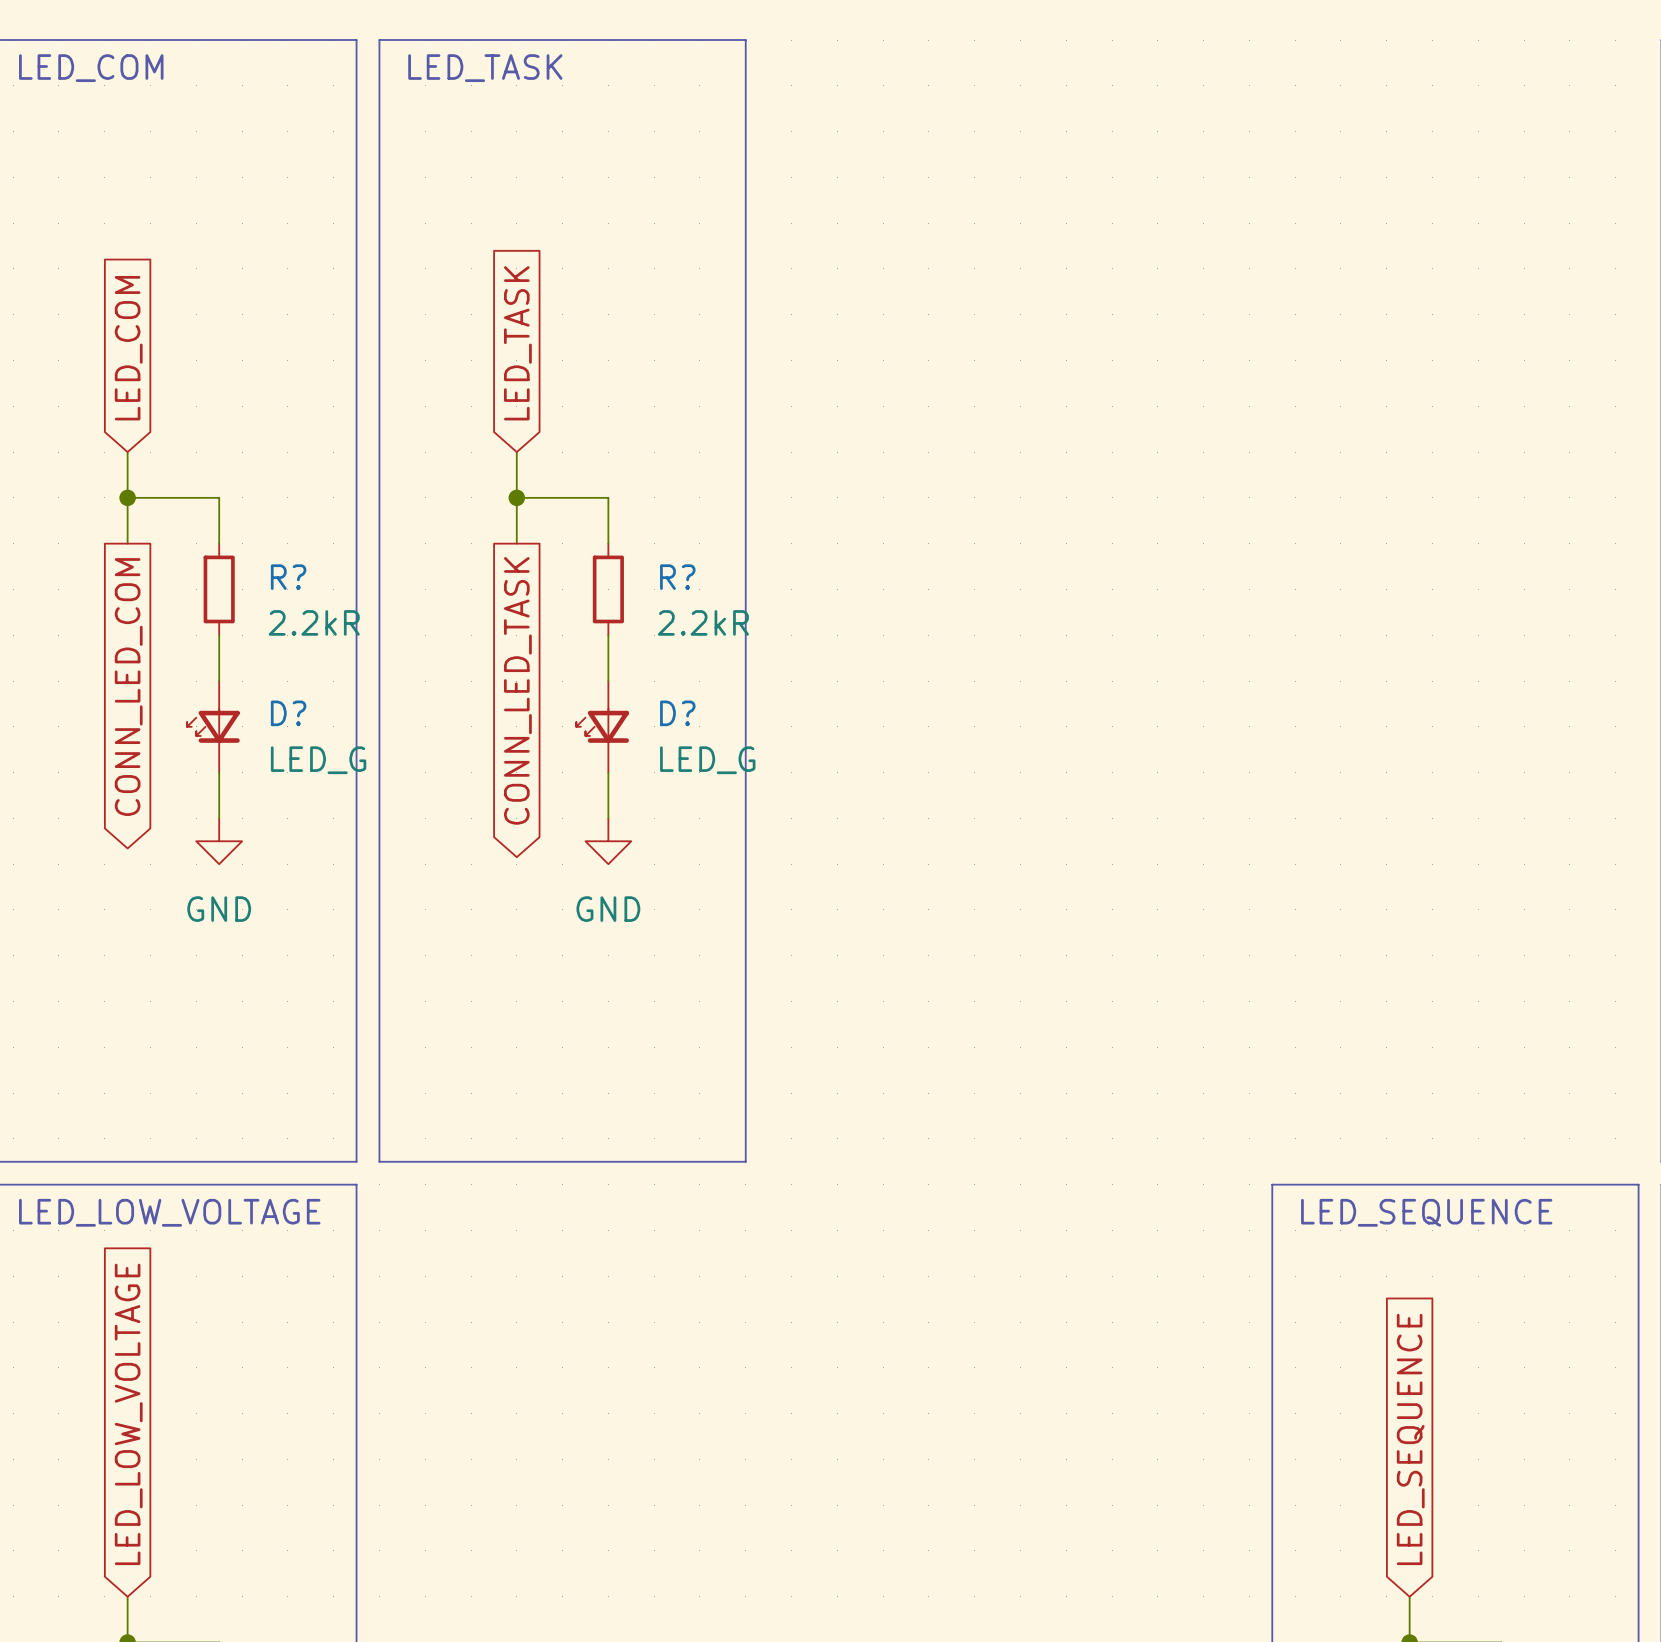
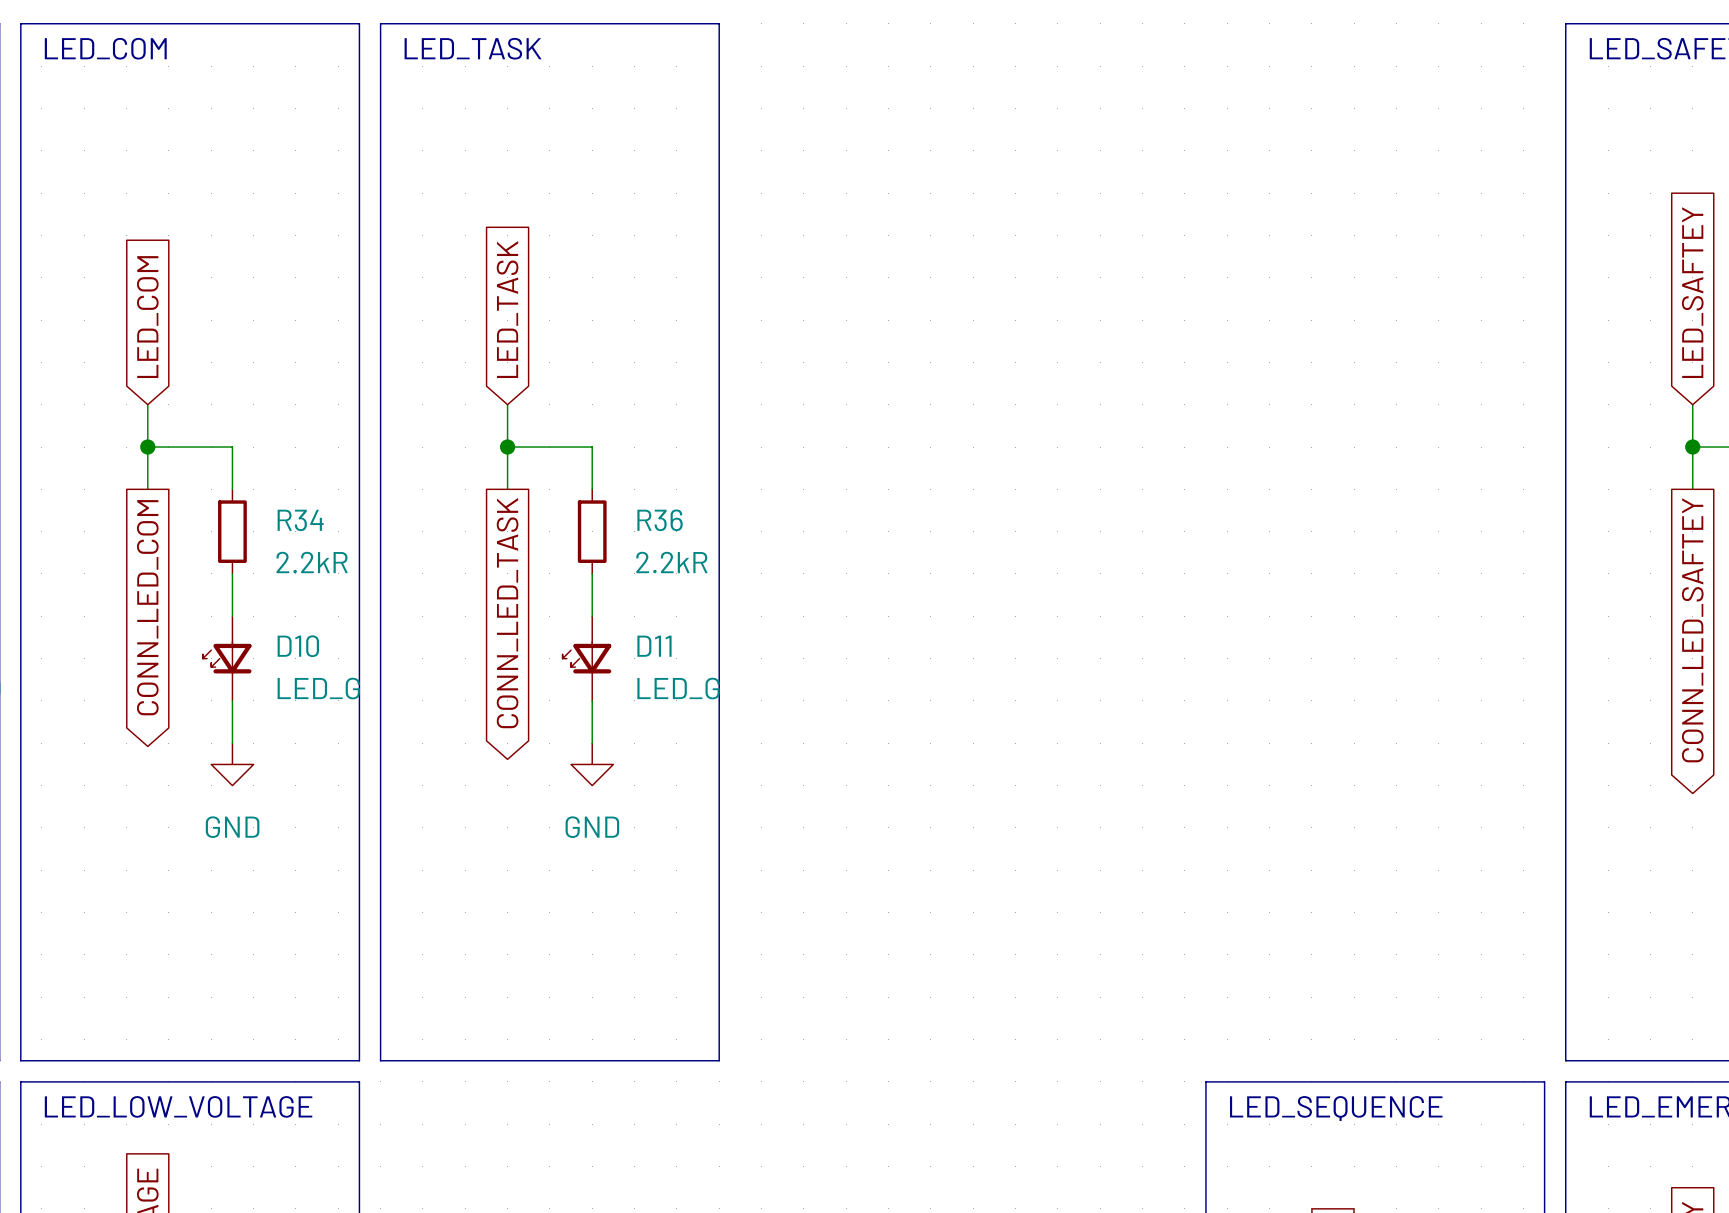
R? name: R? (288, 577) -> R34 (300, 520)
R? name: R? (677, 577) -> R36 (660, 520)
D? name: D? (288, 713) -> D10 (298, 646)
D? name: D? (677, 713) -> D11 (654, 646)

